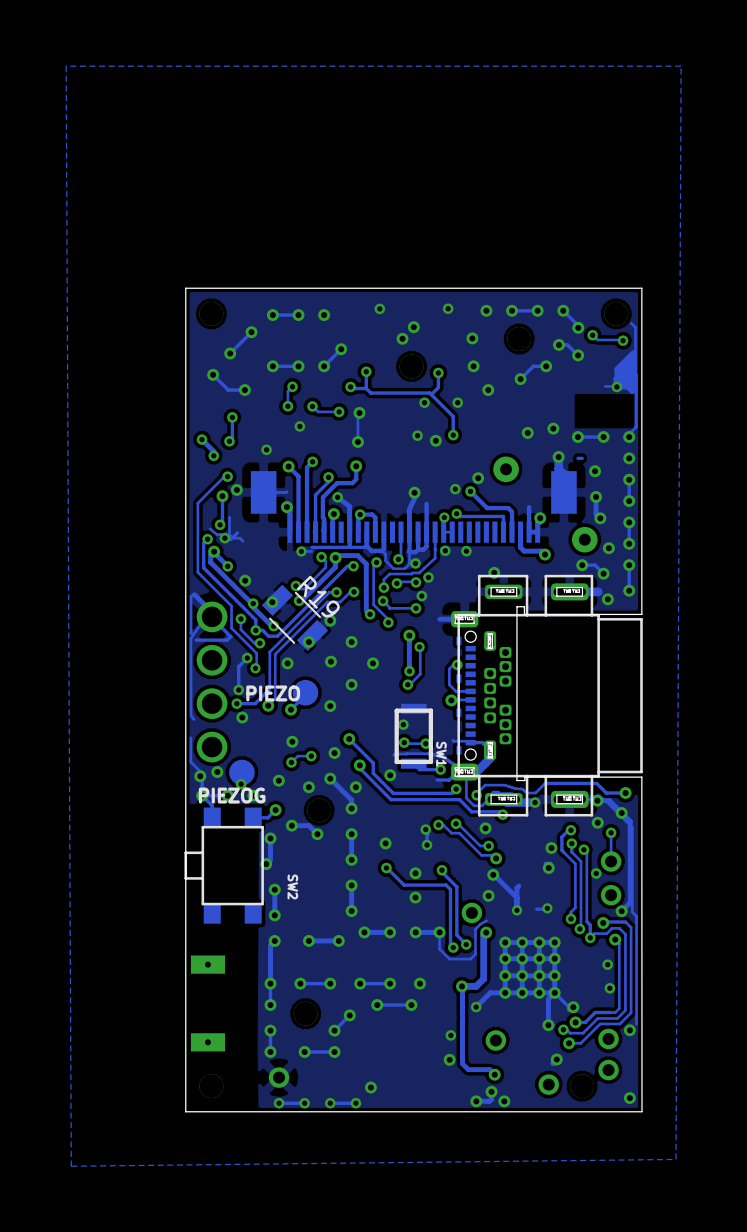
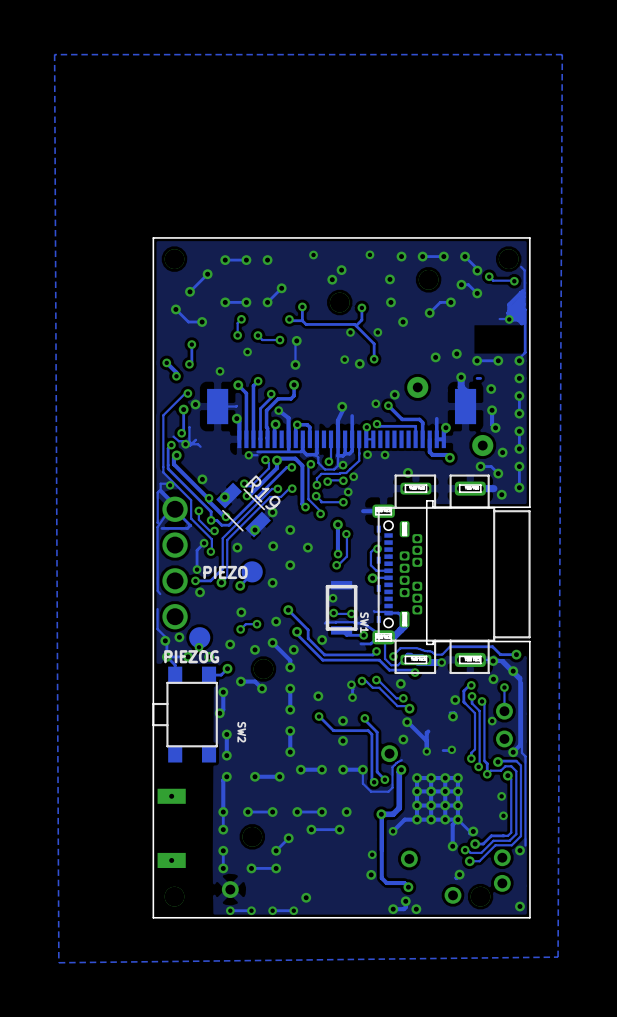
track: (214, 551) (227, 566) -> none
via: (227, 566) -> none
track: none -> (170, 485) (160, 483) (160, 490)
via: none -> (170, 485)

